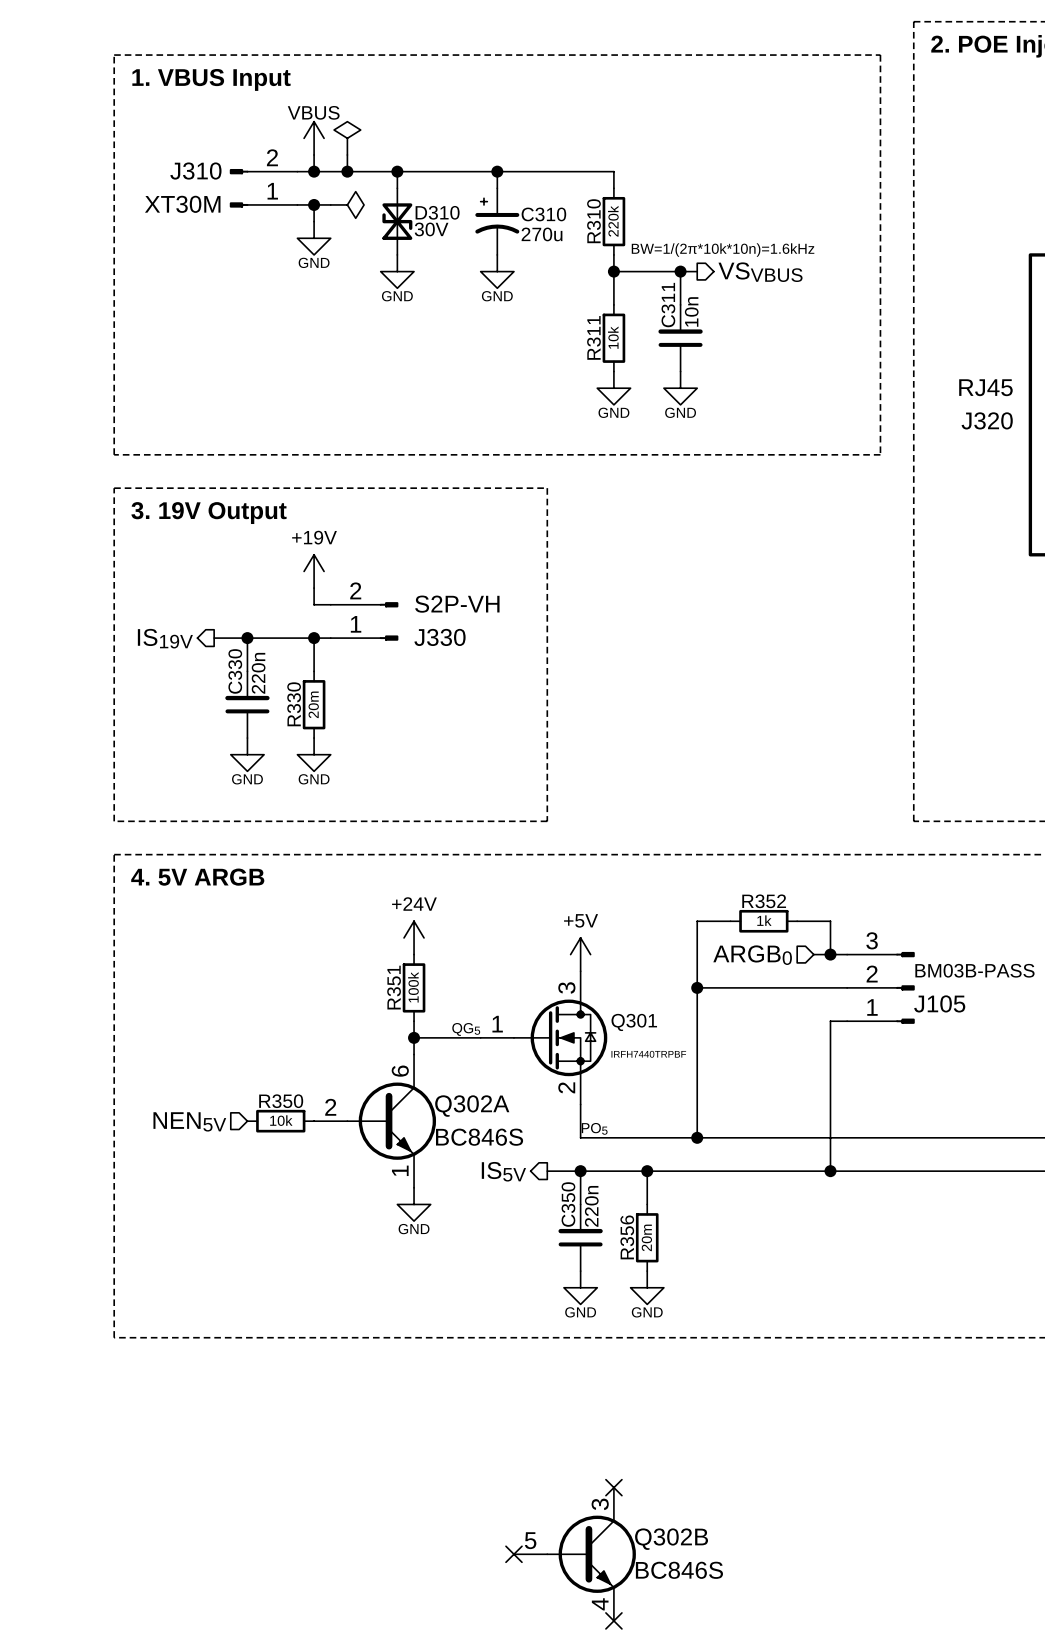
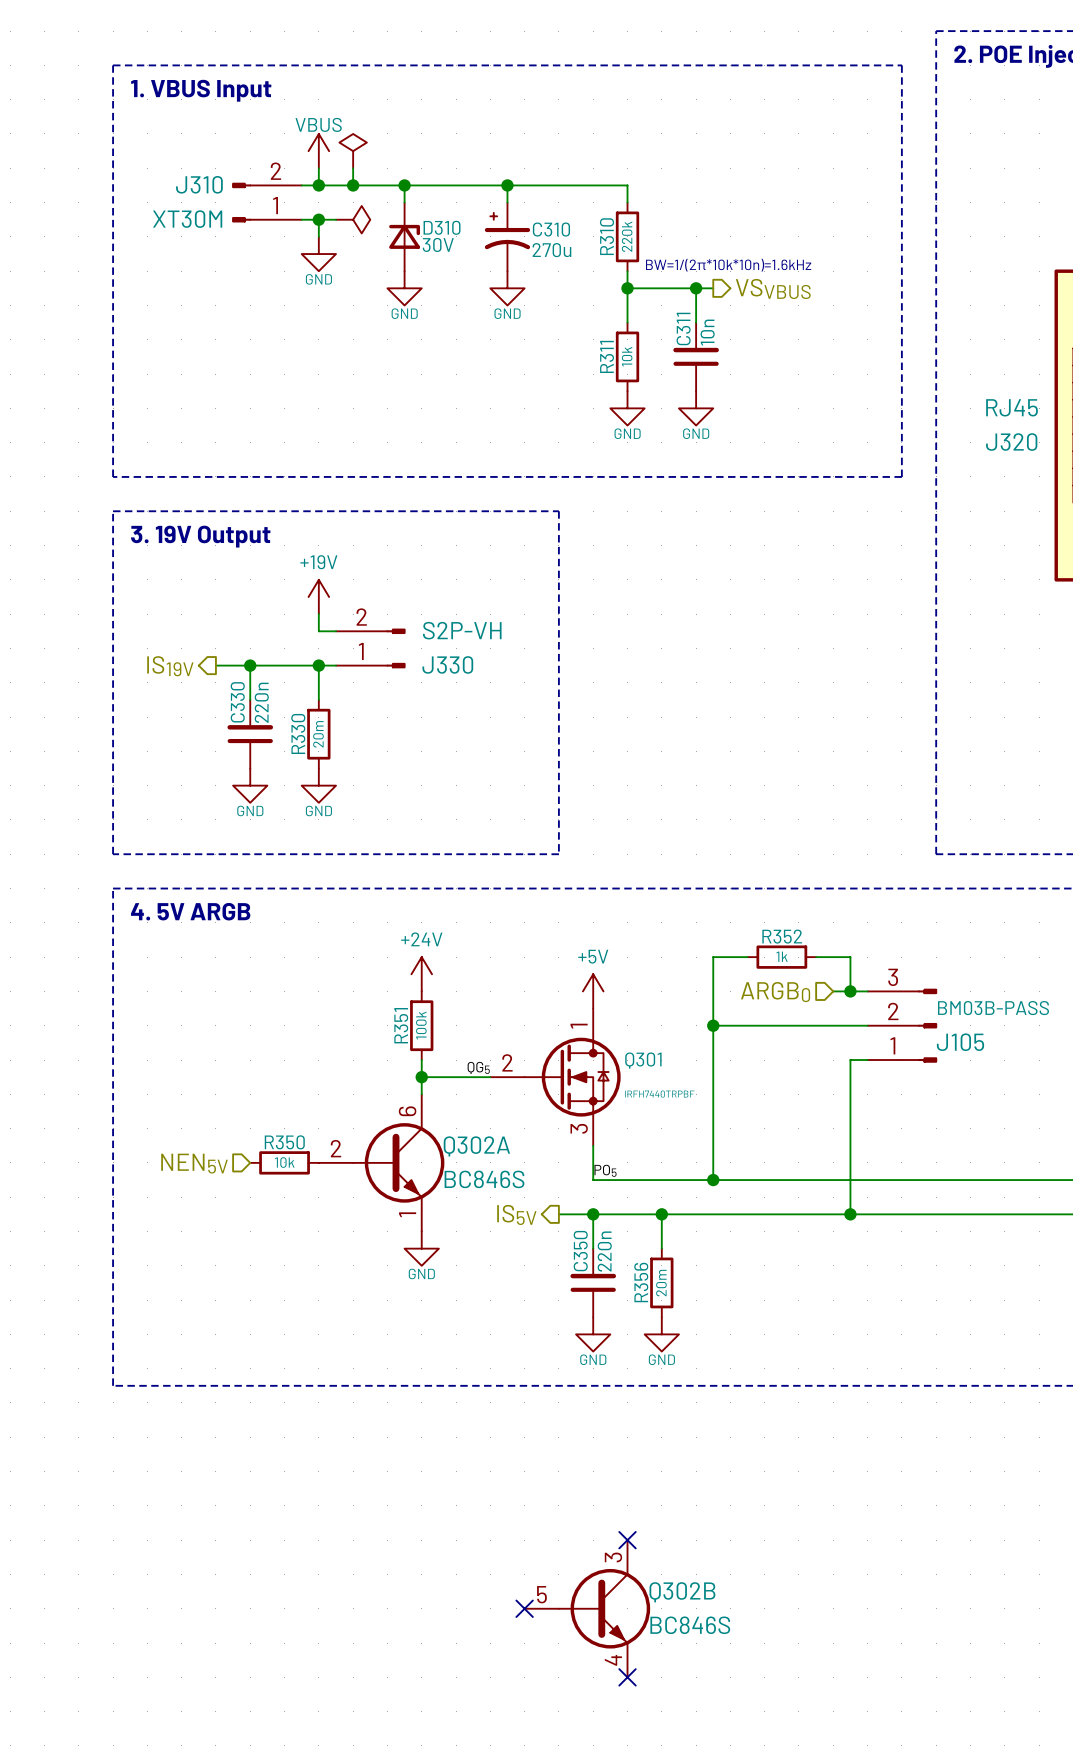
D310 symbol: [382, 188, 413, 255] -> [389, 202, 421, 272]
Q301 pin number: 3 (566, 987) -> 1 (579, 1026)
Q301 pin number: 1 (497, 1024) -> 2 (507, 1062)
Q301 pin number: 2 (566, 1087) -> 3 (579, 1128)

